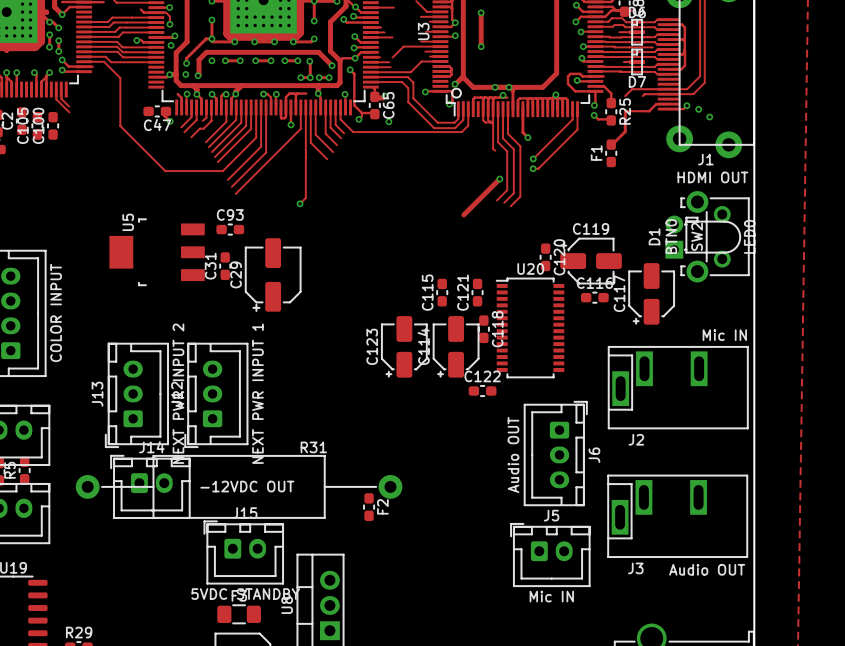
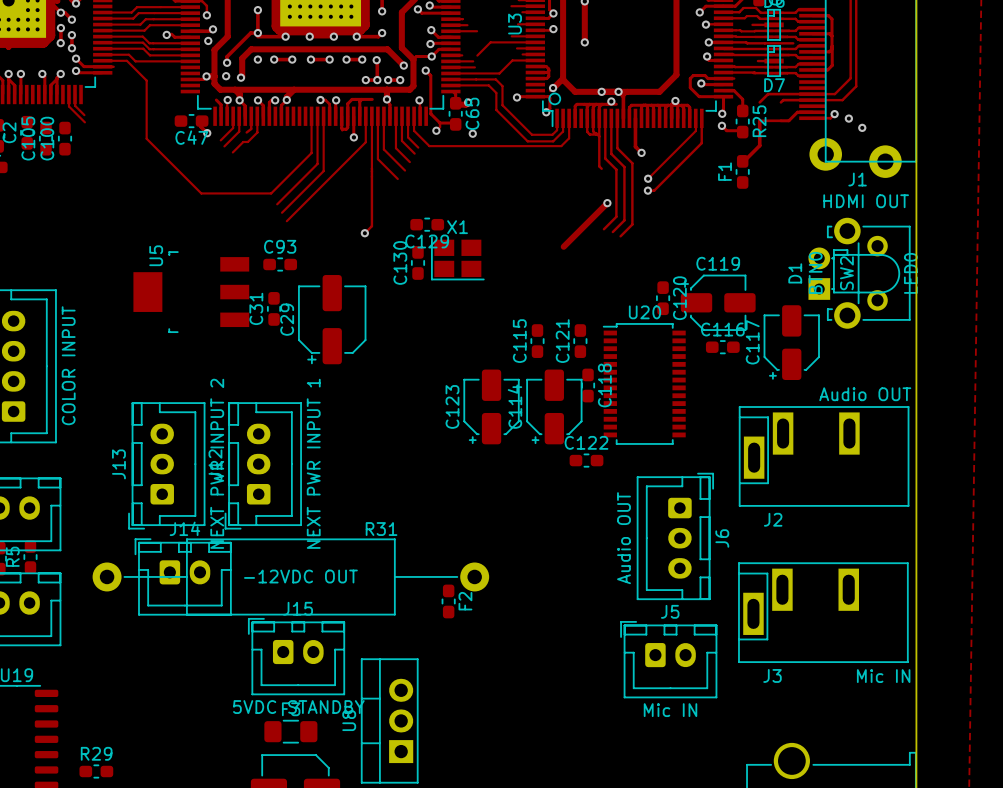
track: (226, 109) (226, 121) (205, 142) -> none
track: (236, 109) (236, 119) (208, 147) -> none
track: (241, 109) (241, 122) (211, 152) -> none
track: (246, 109) (246, 125) (214, 157) -> none
track: (251, 109) (251, 128) (217, 162) -> none
C129: none -> (427, 224)
X1: none -> (457, 258)
C130: none -> (418, 262)
text position: Mic IN (724, 335) -> Mic IN (883, 676)
text position: Audio OUT (707, 569) -> Audio OUT (865, 394)

